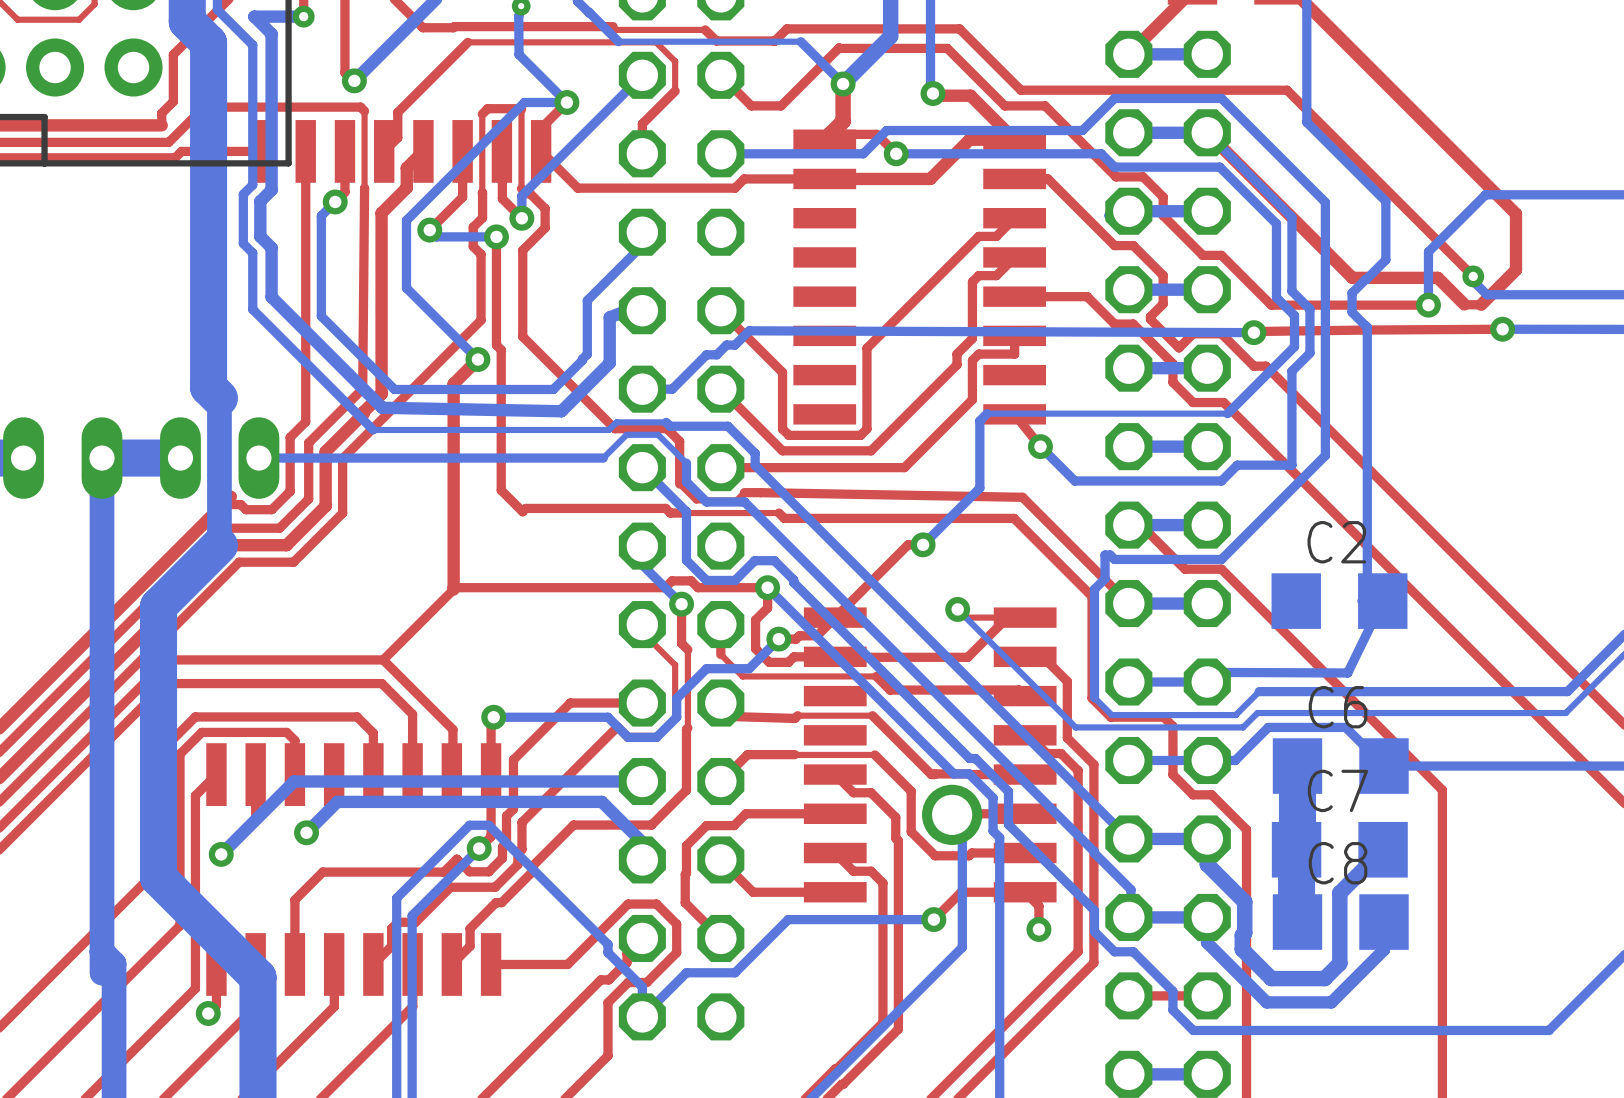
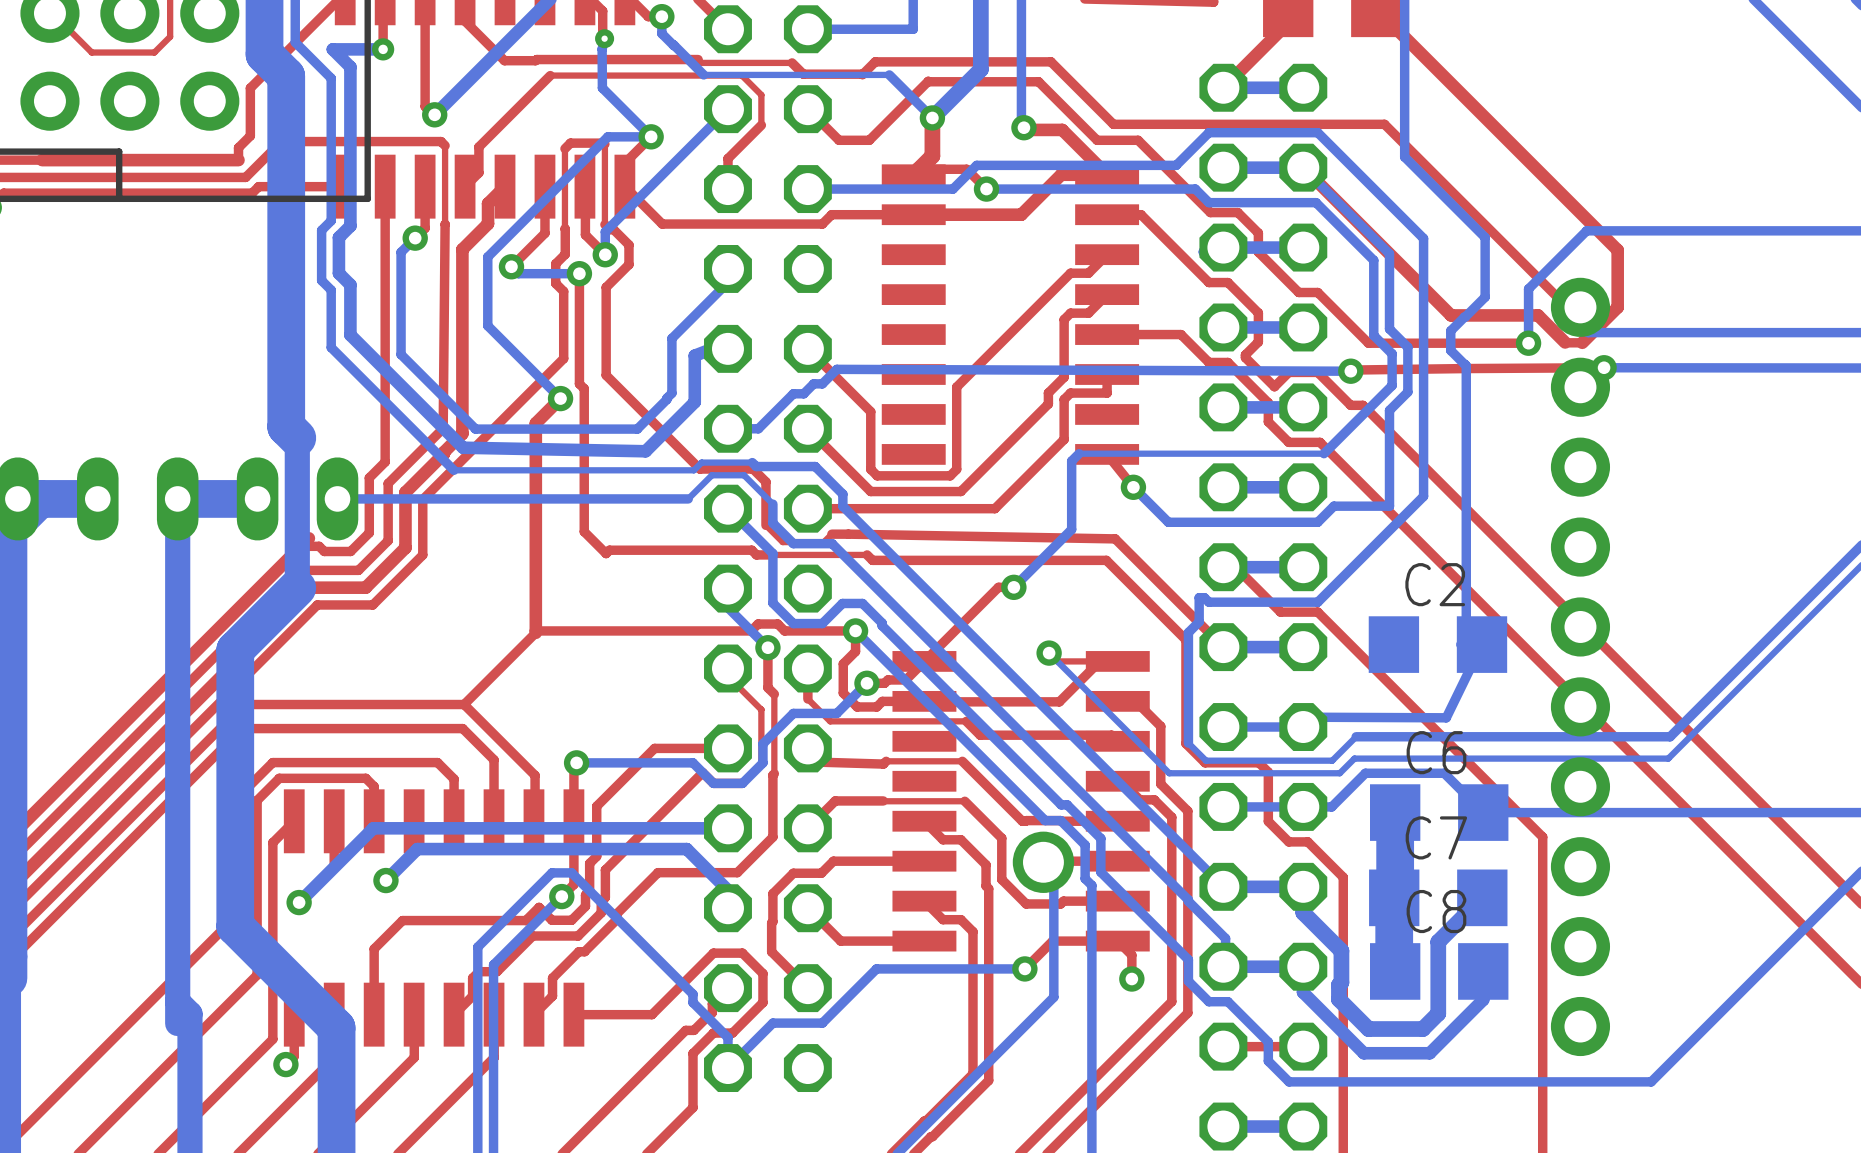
part: none -> (1580, 666)

